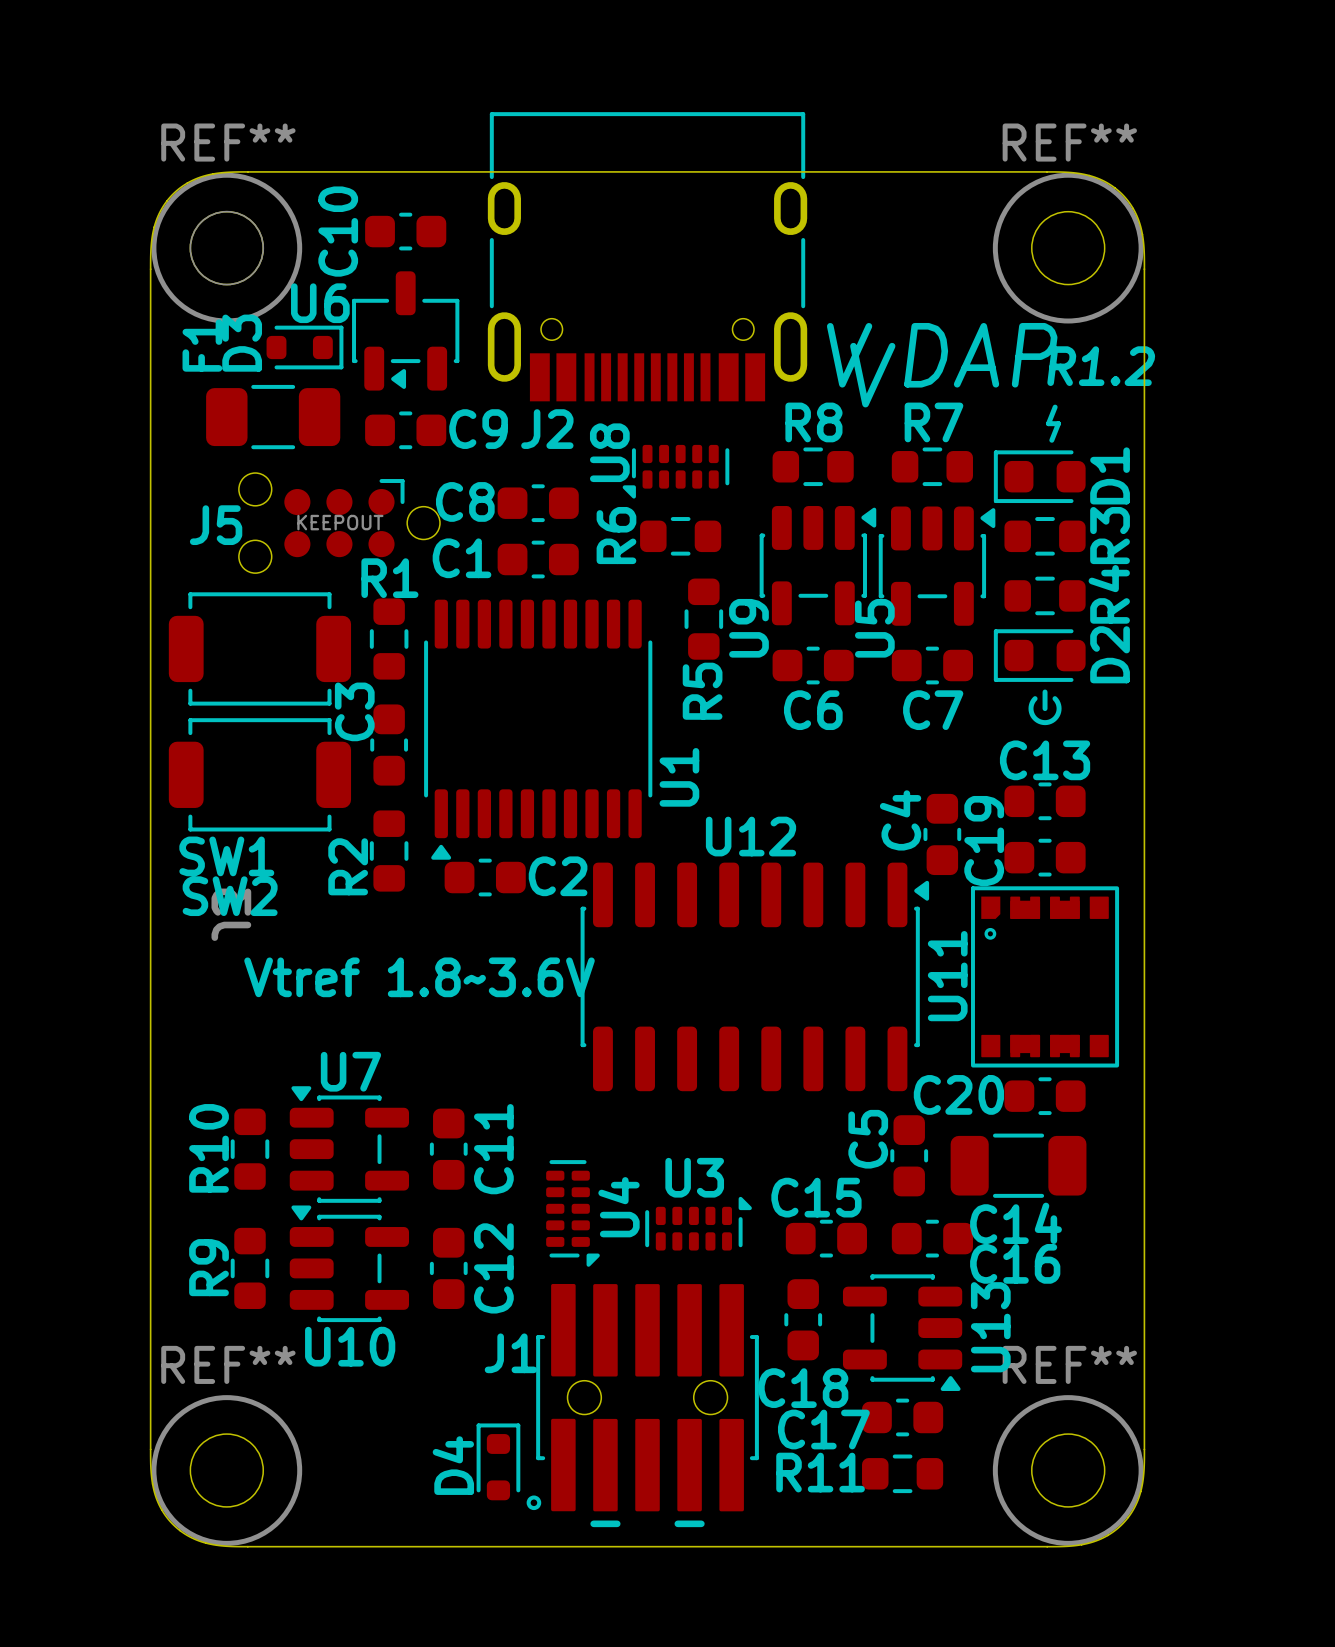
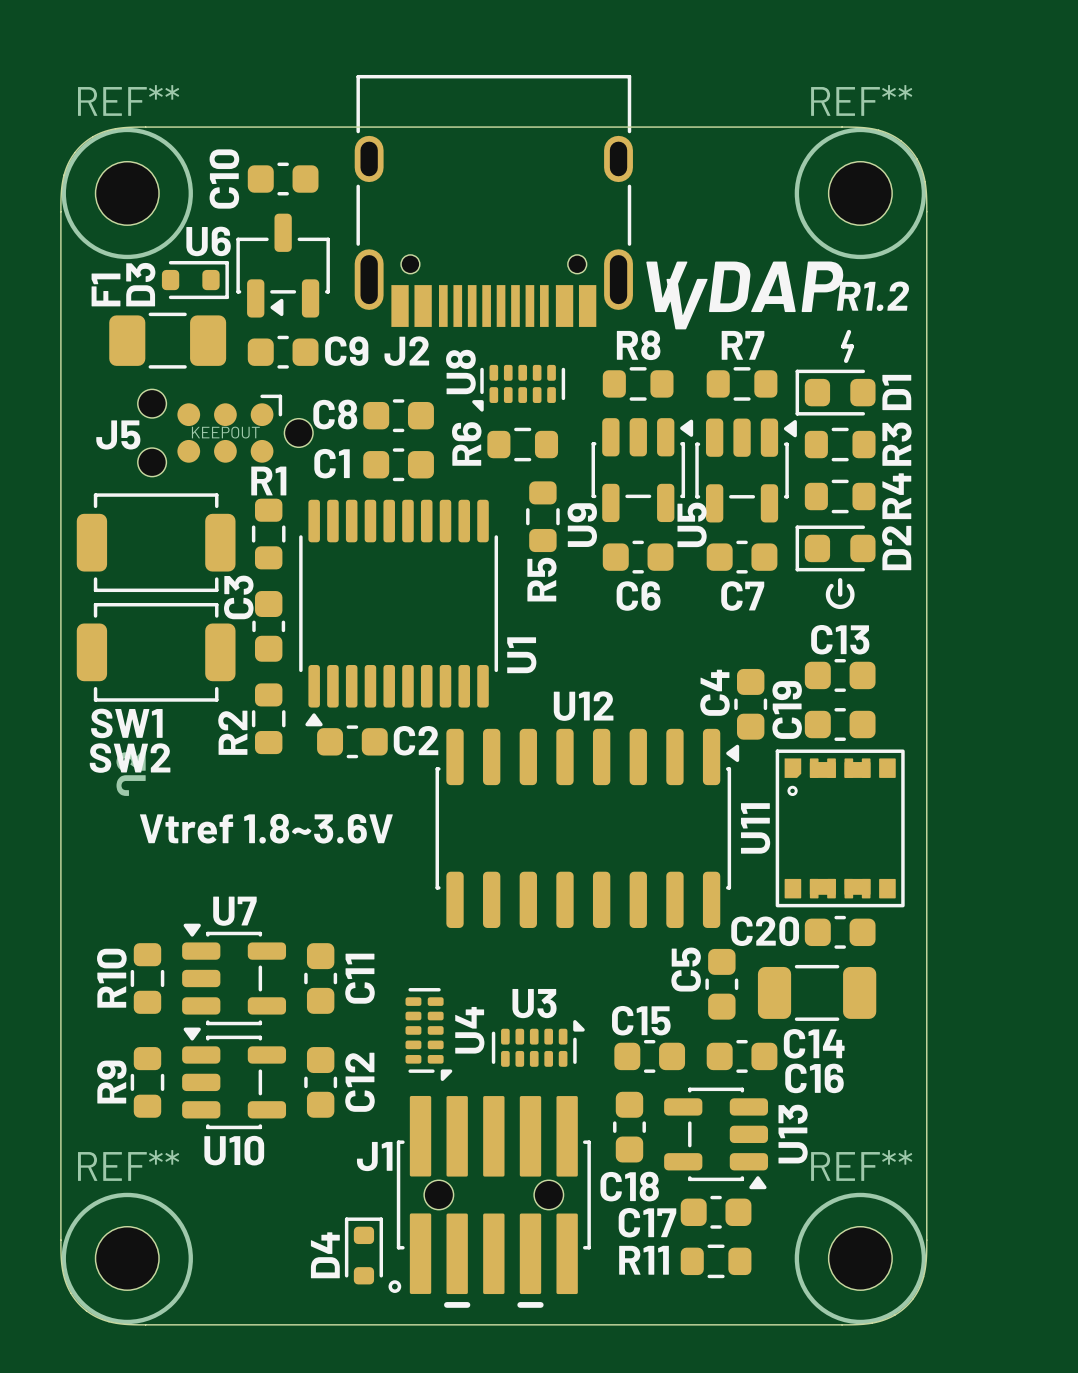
drawing: [189, 210, 265, 286] -> none

